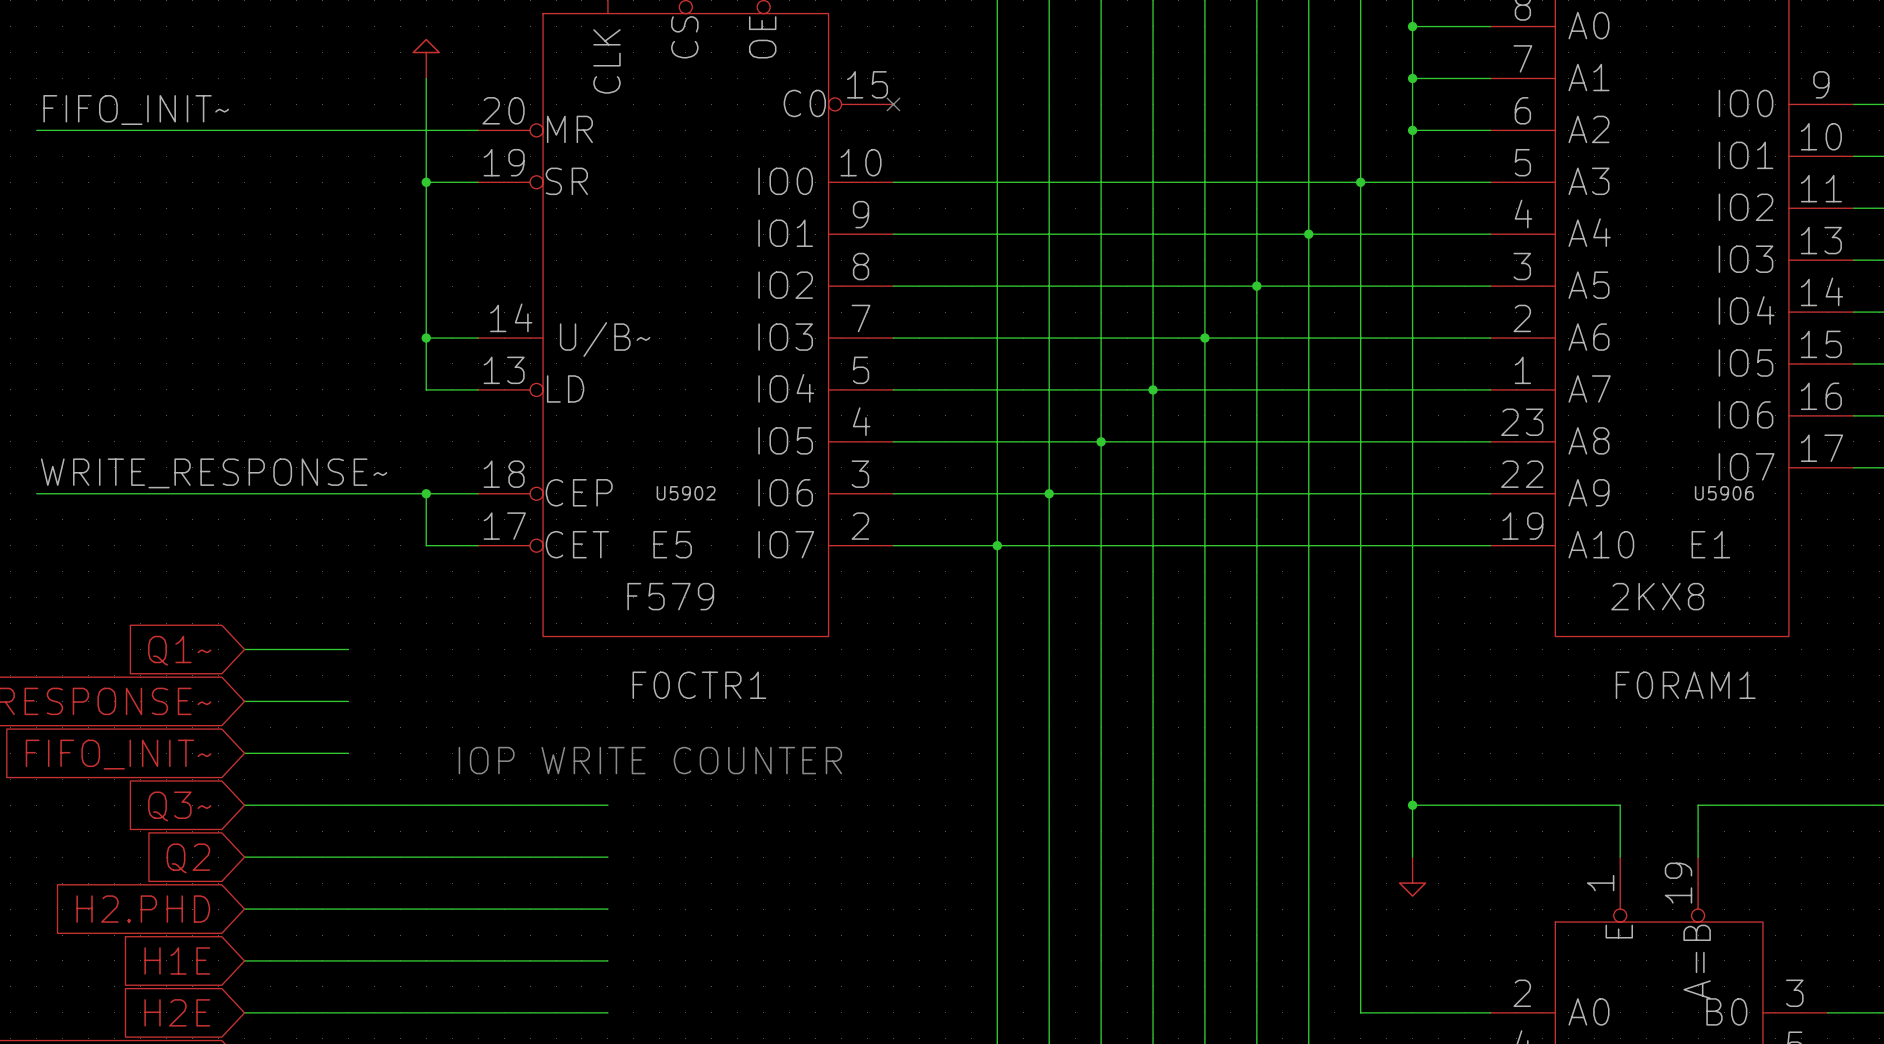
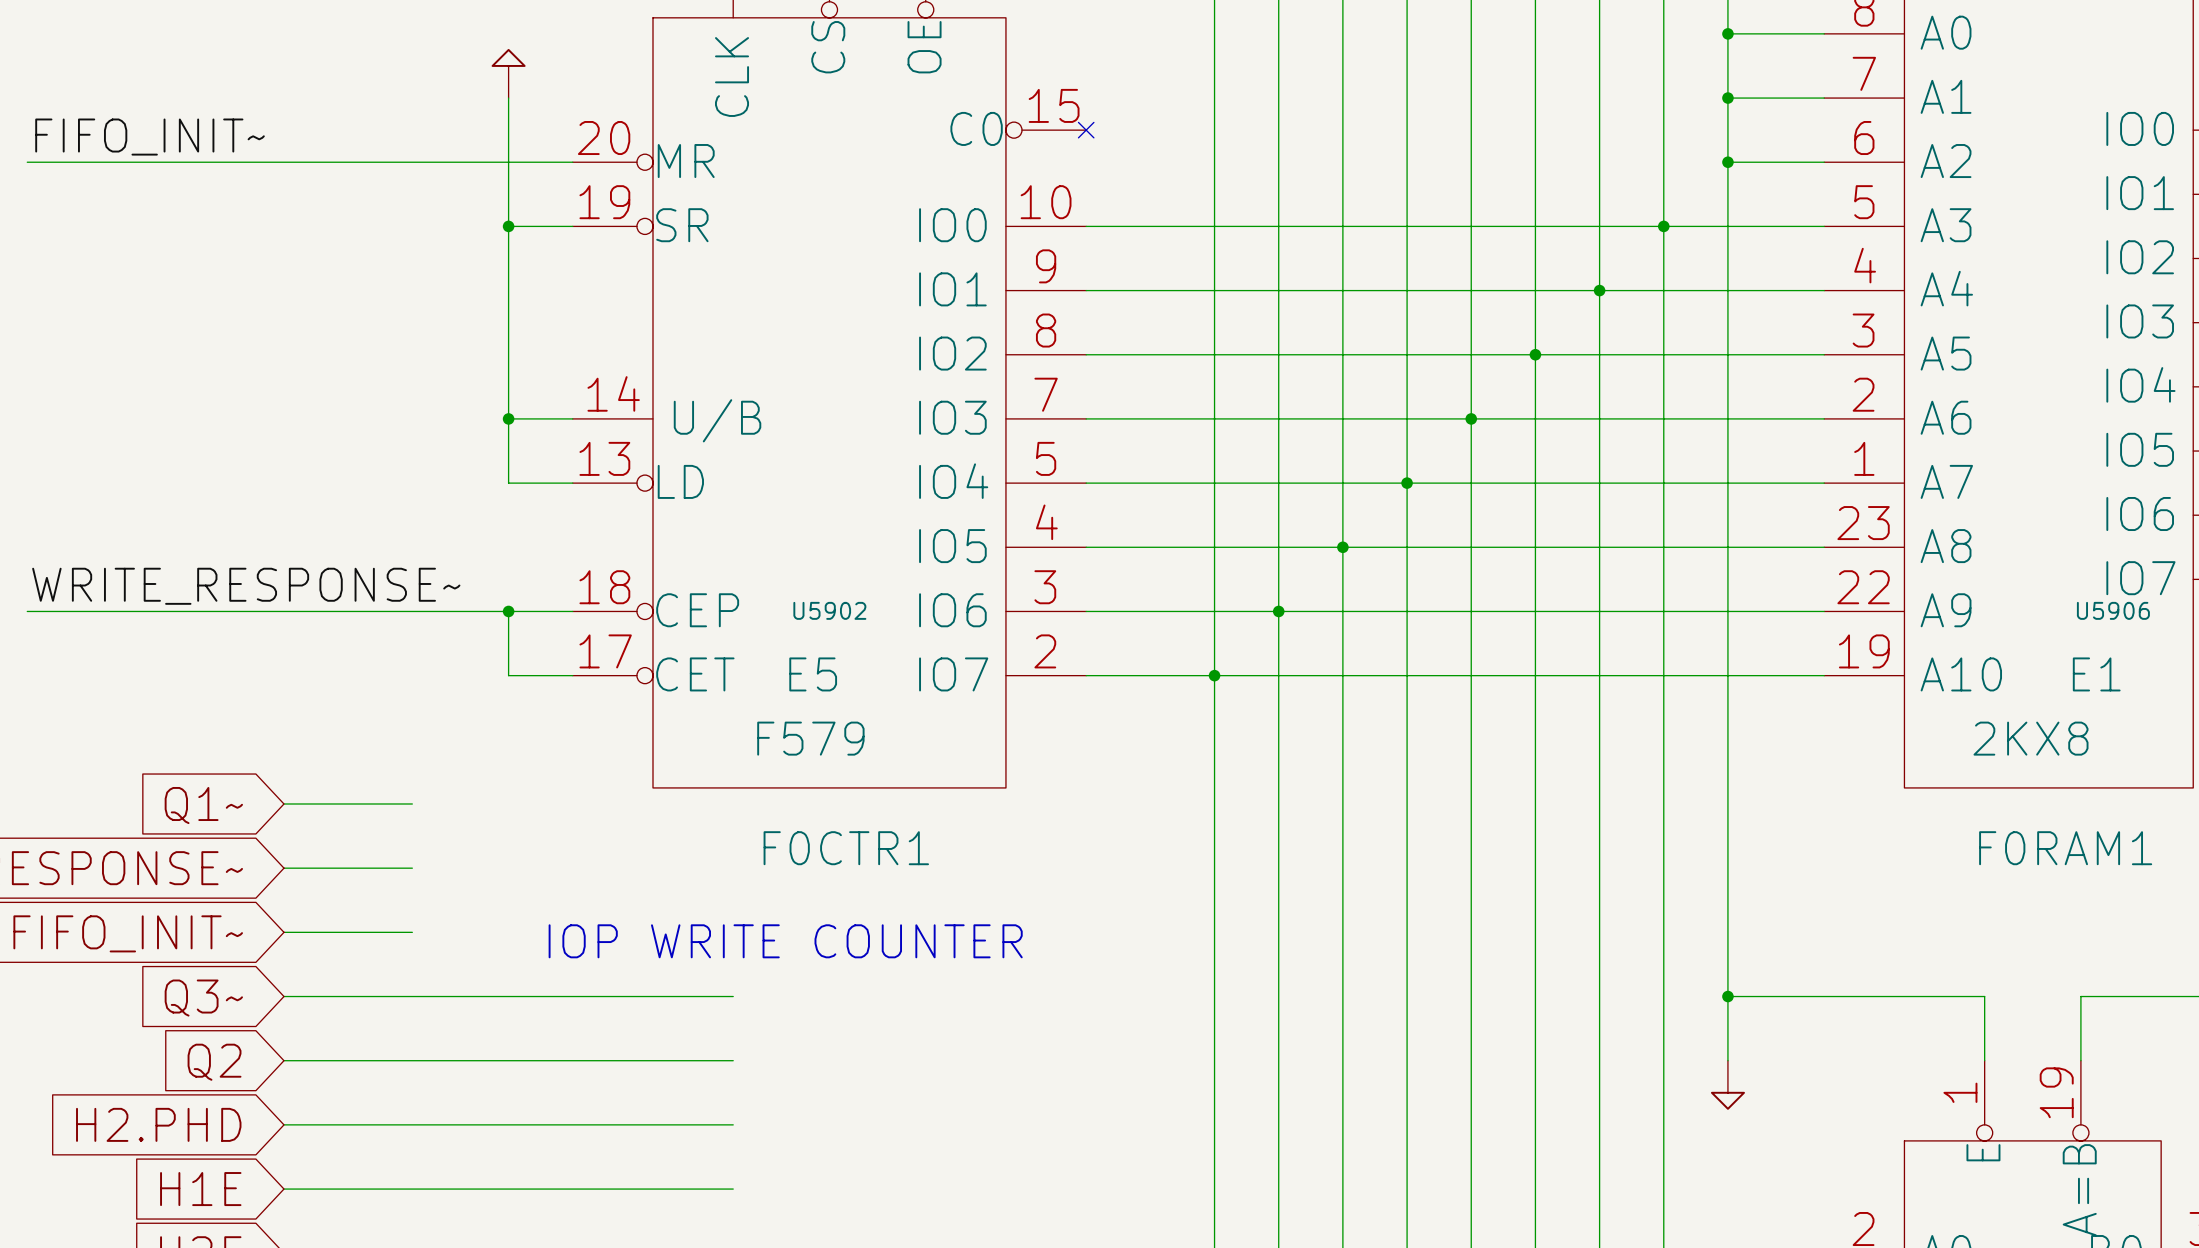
U5902 pin name: U/B~ (605, 339) -> U/B (717, 420)

